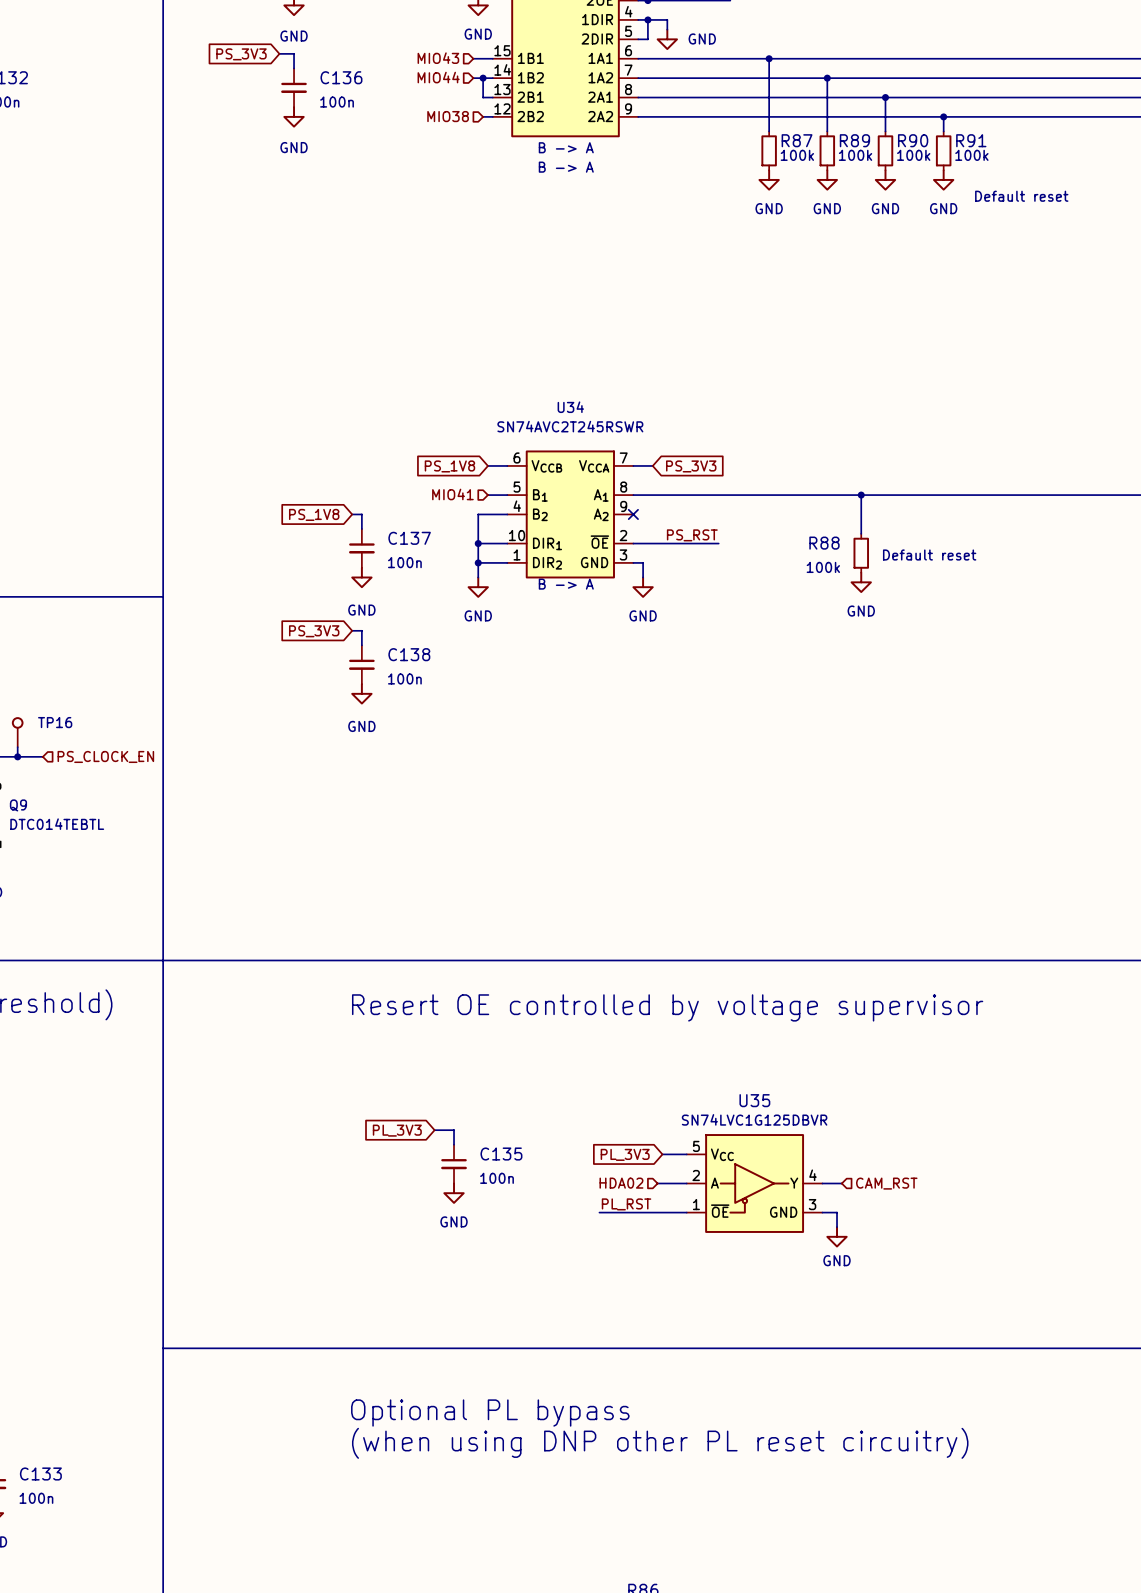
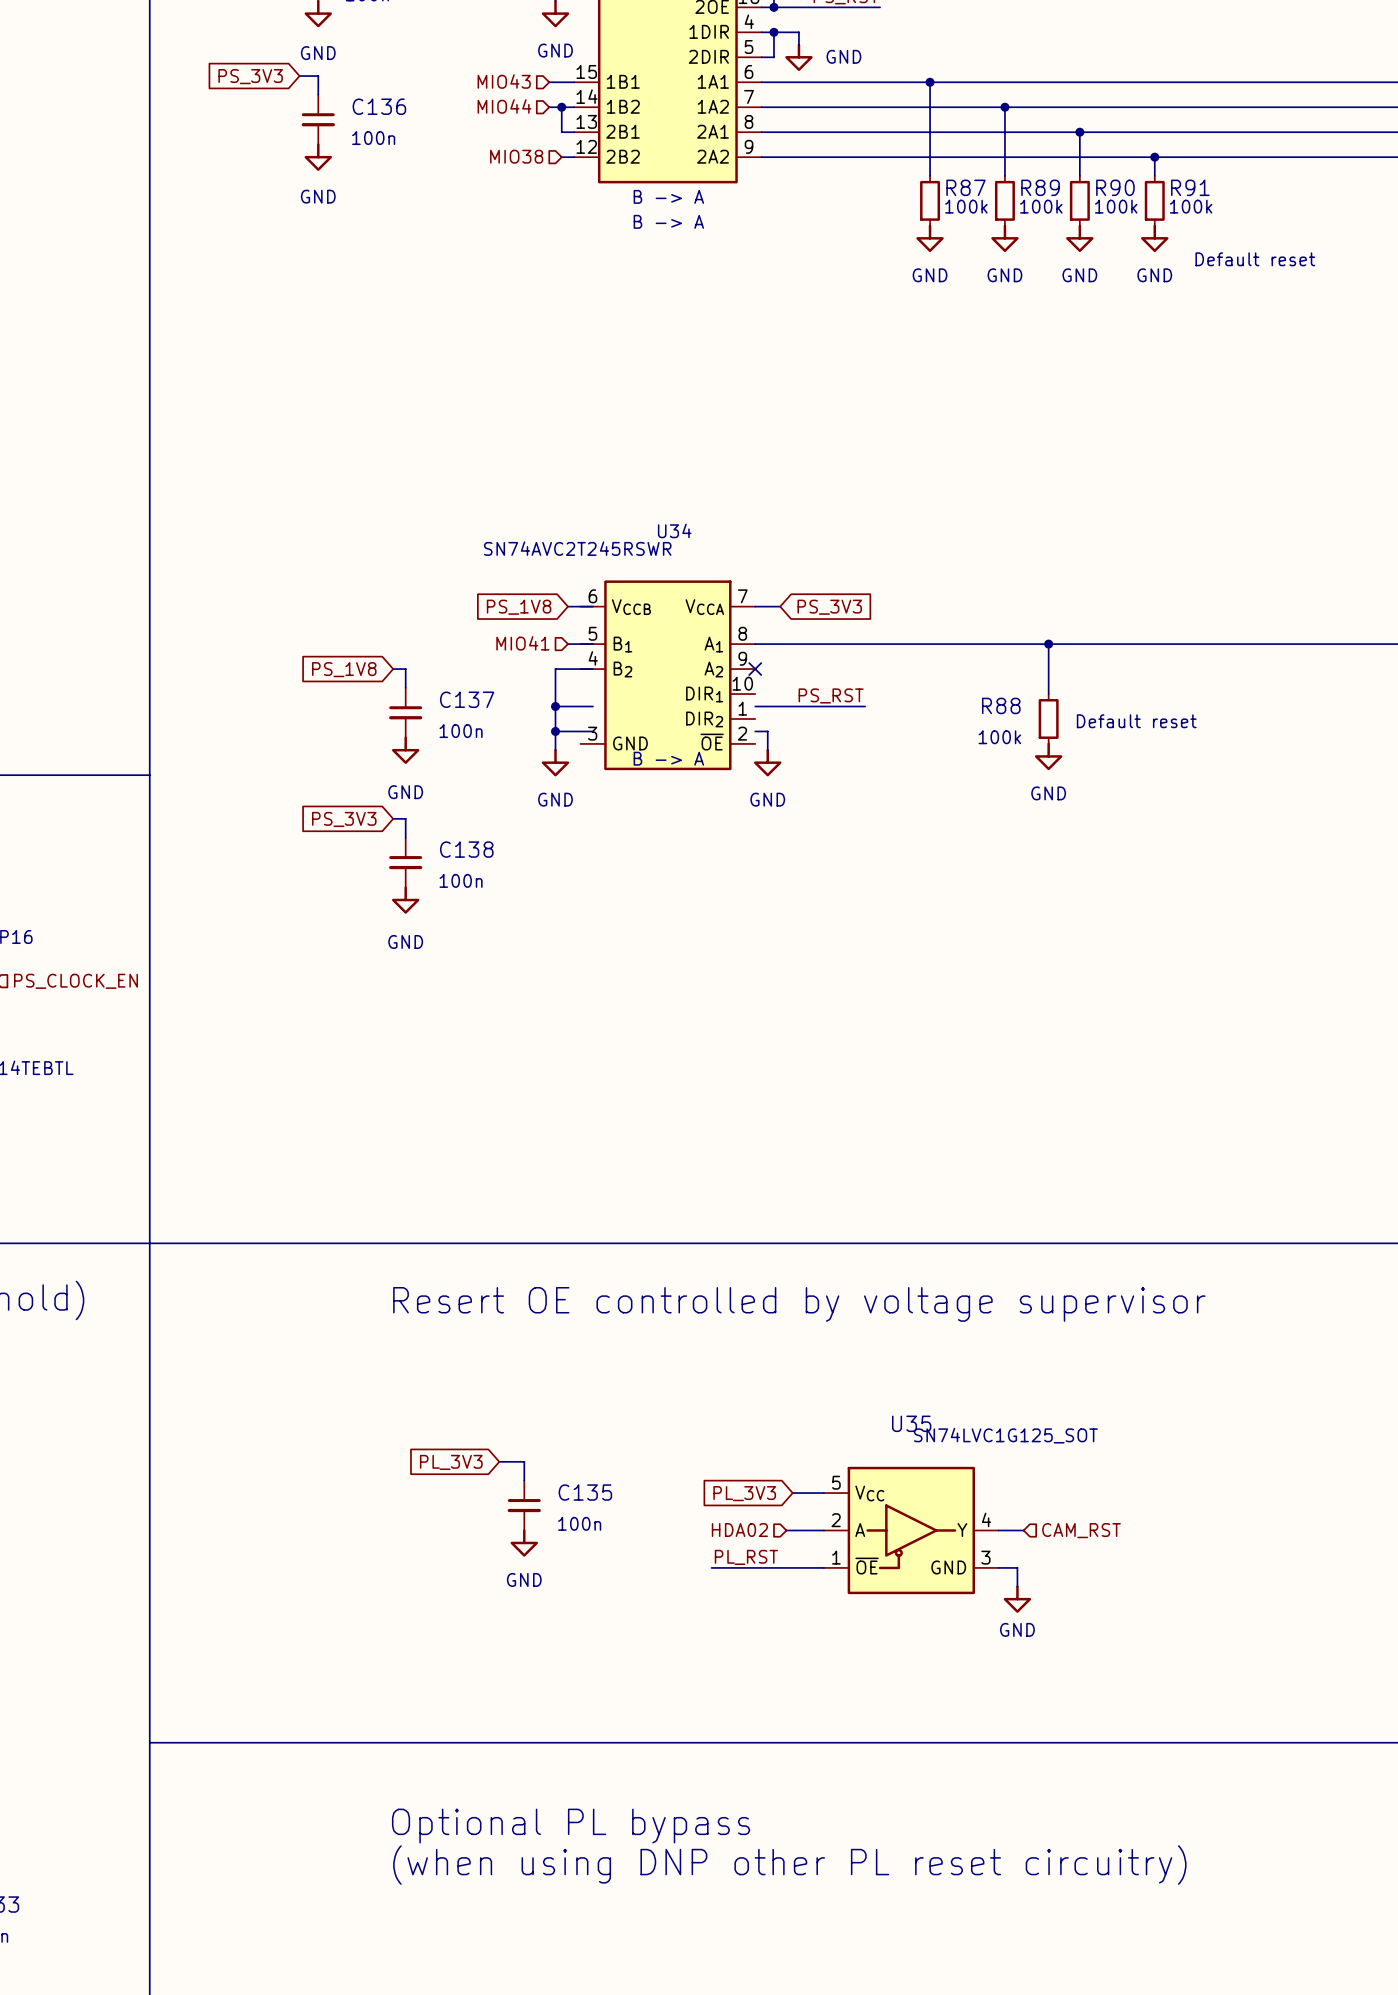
U34 text position: SN74AVC2T245RSWR (570, 426) -> SN74AVC2T245RSWR (577, 548)
U34 symbol: [507, 450, 634, 579] -> [580, 580, 756, 771]
U35 value: none -> SN74LVC1G125_SOT (1005, 1435)
U35 text: SN74LVC1G125DBVR (754, 1119) -> none

